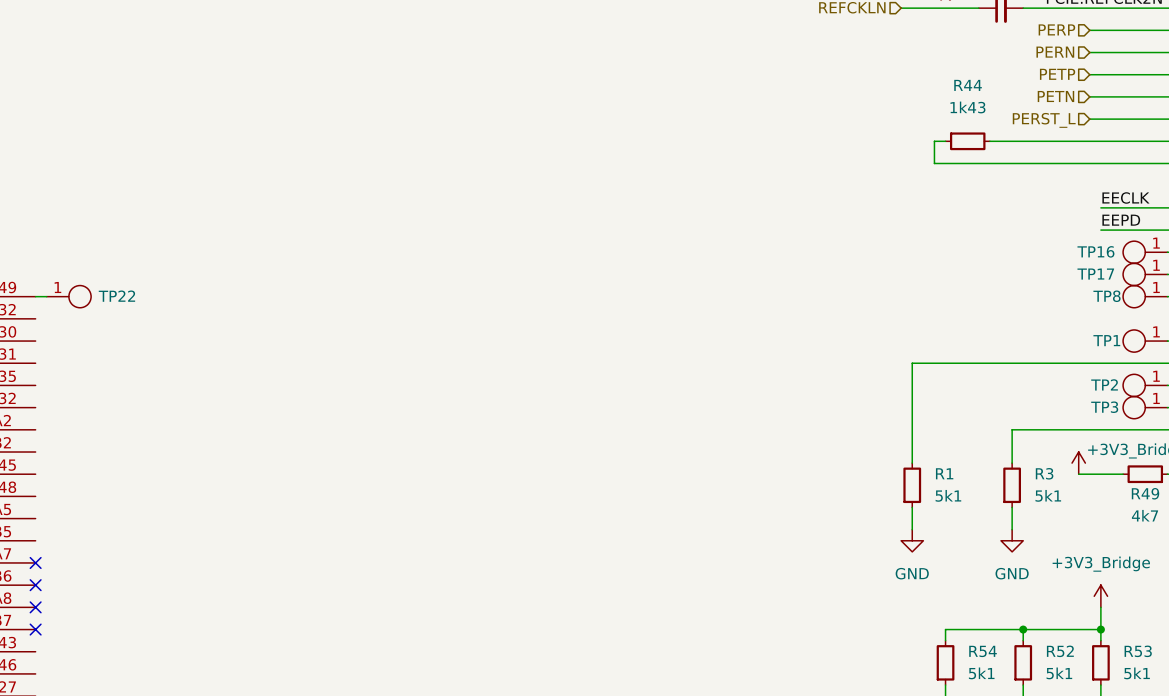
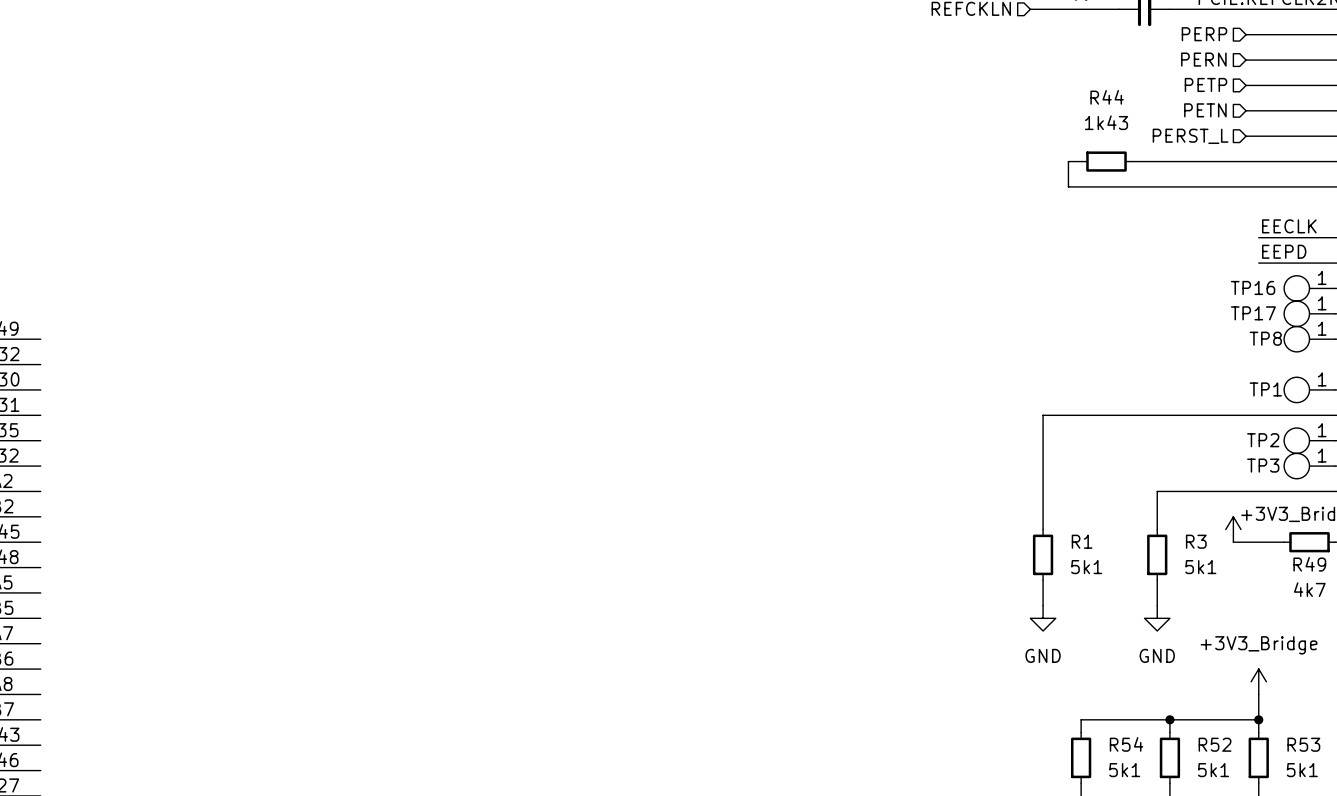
wire: (35, 296) (46, 296) -> none
TP22: (68, 296) -> none
no-connect mark: (35, 562) -> none
no-connect mark: (35, 585) -> none
no-connect mark: (35, 607) -> none
no-connect mark: (35, 629) -> none

